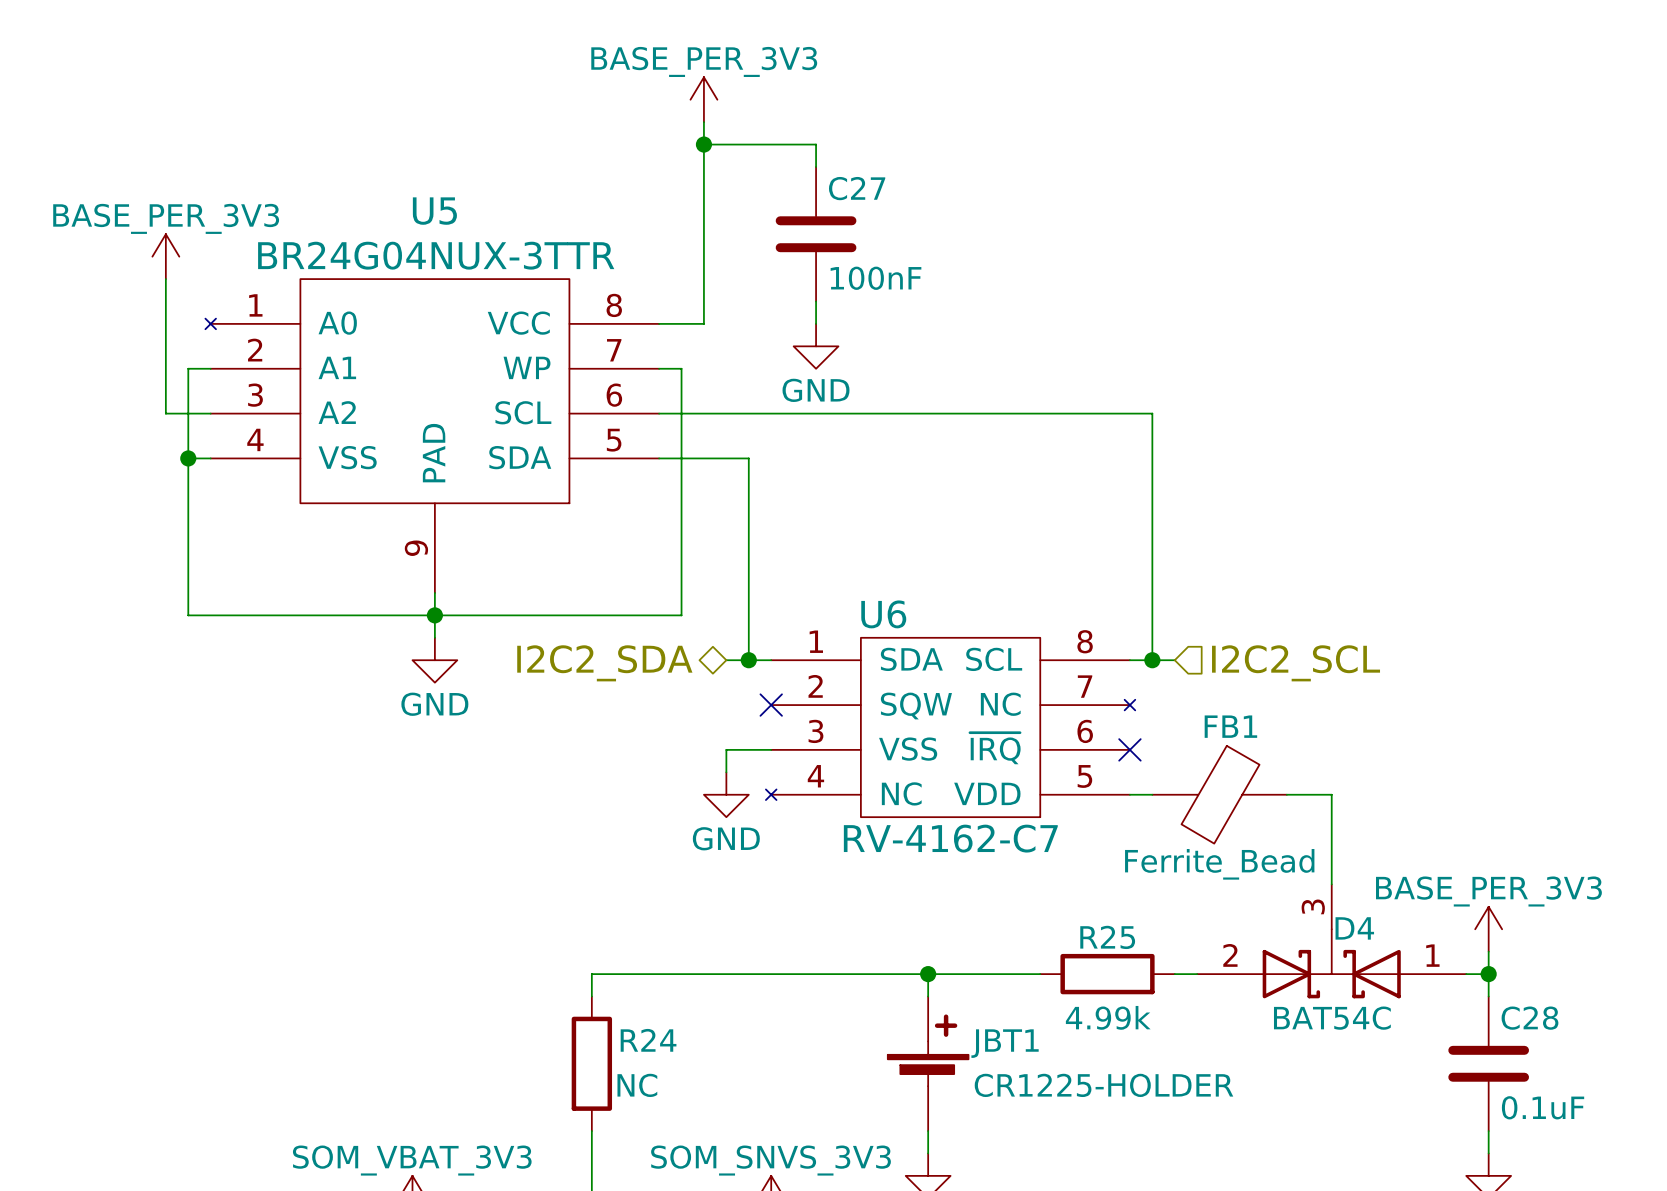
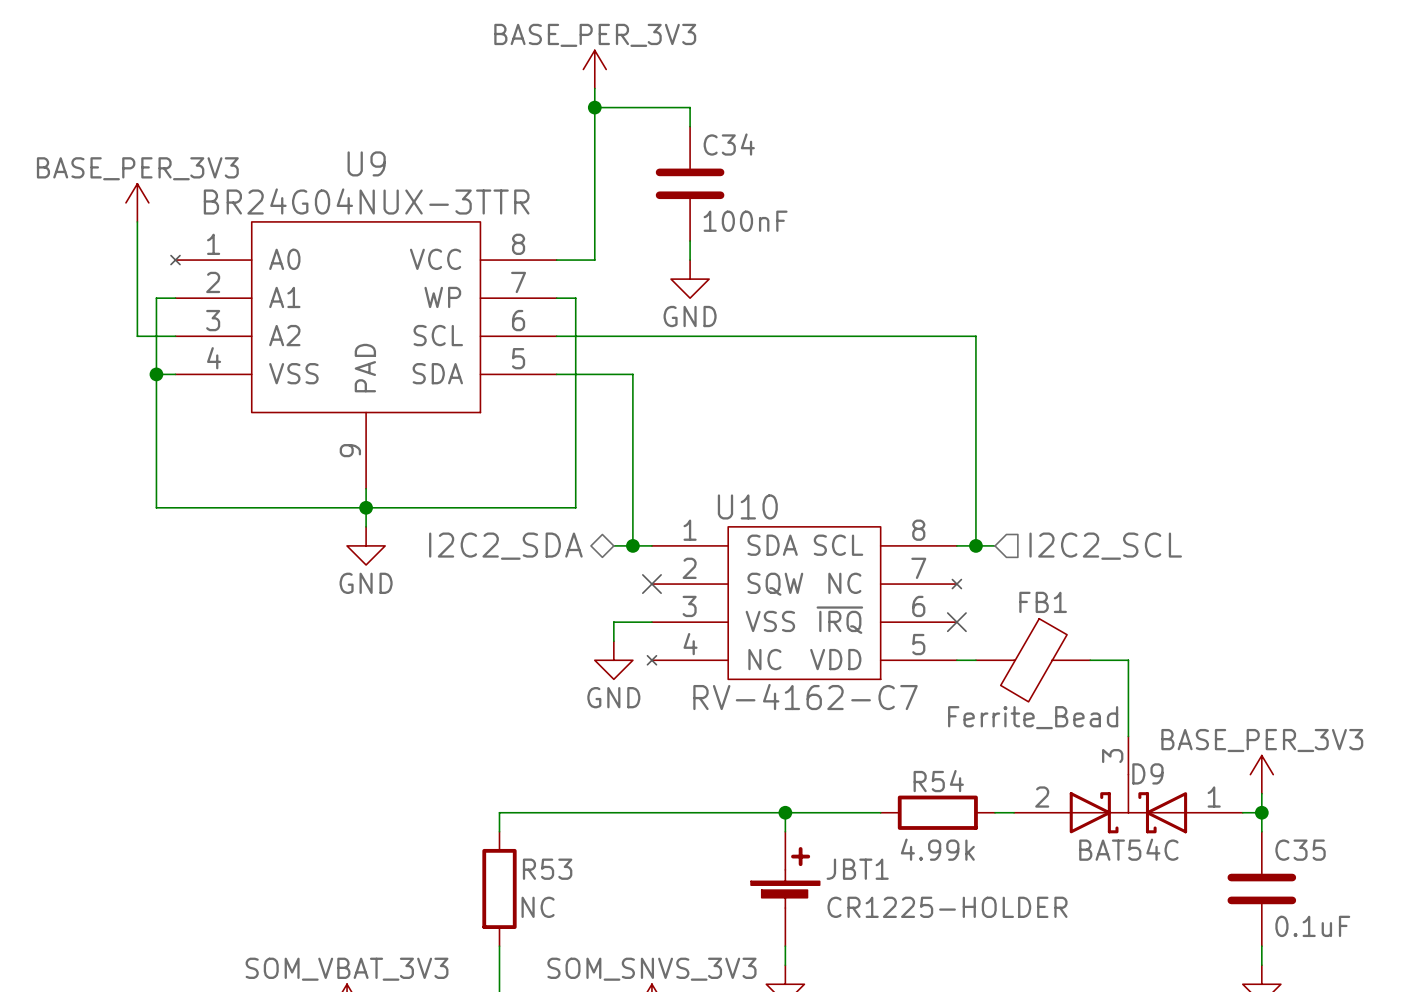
C27 name: C27 (857, 188) -> C34 (729, 144)
U5 name: U5 (434, 211) -> U9 (366, 163)
U6 name: U6 (883, 614) -> U10 (747, 506)
D4 name: D4 (1354, 928) -> D9 (1147, 773)
R25 name: R25 (1107, 937) -> R54 (938, 781)
C28 name: C28 (1529, 1018) -> C35 (1300, 850)
R24 name: R24 (648, 1040) -> R53 (547, 869)

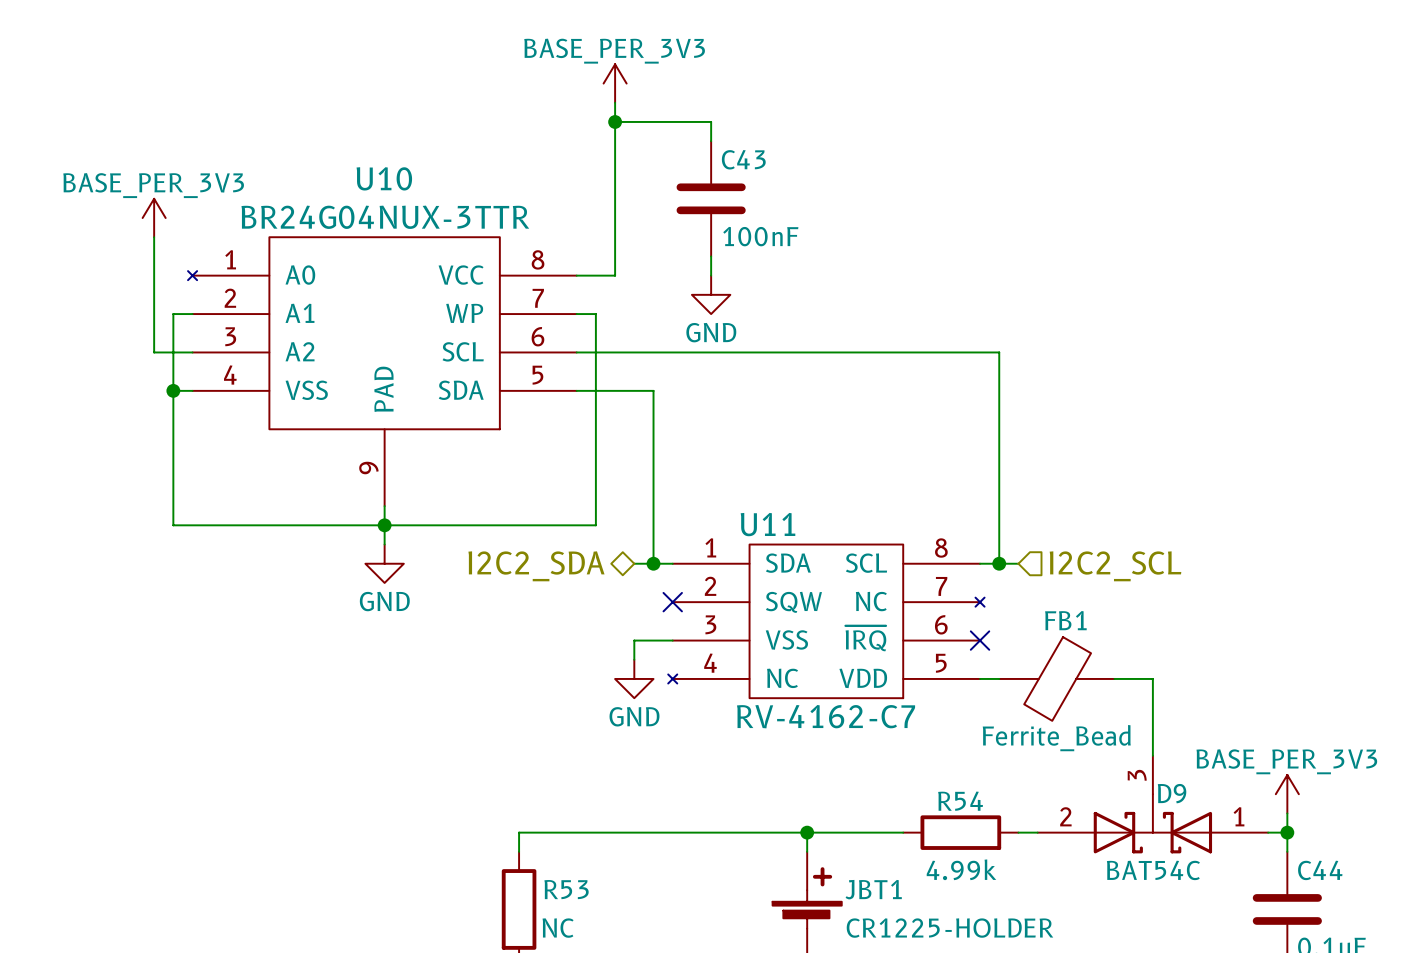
C34 name: C34 (729, 144) -> C43 (743, 159)
U9 name: U9 (366, 163) -> U10 (384, 178)
U10 name: U10 (747, 506) -> U11 (768, 524)
C35 name: C35 (1300, 850) -> C44 (1320, 870)

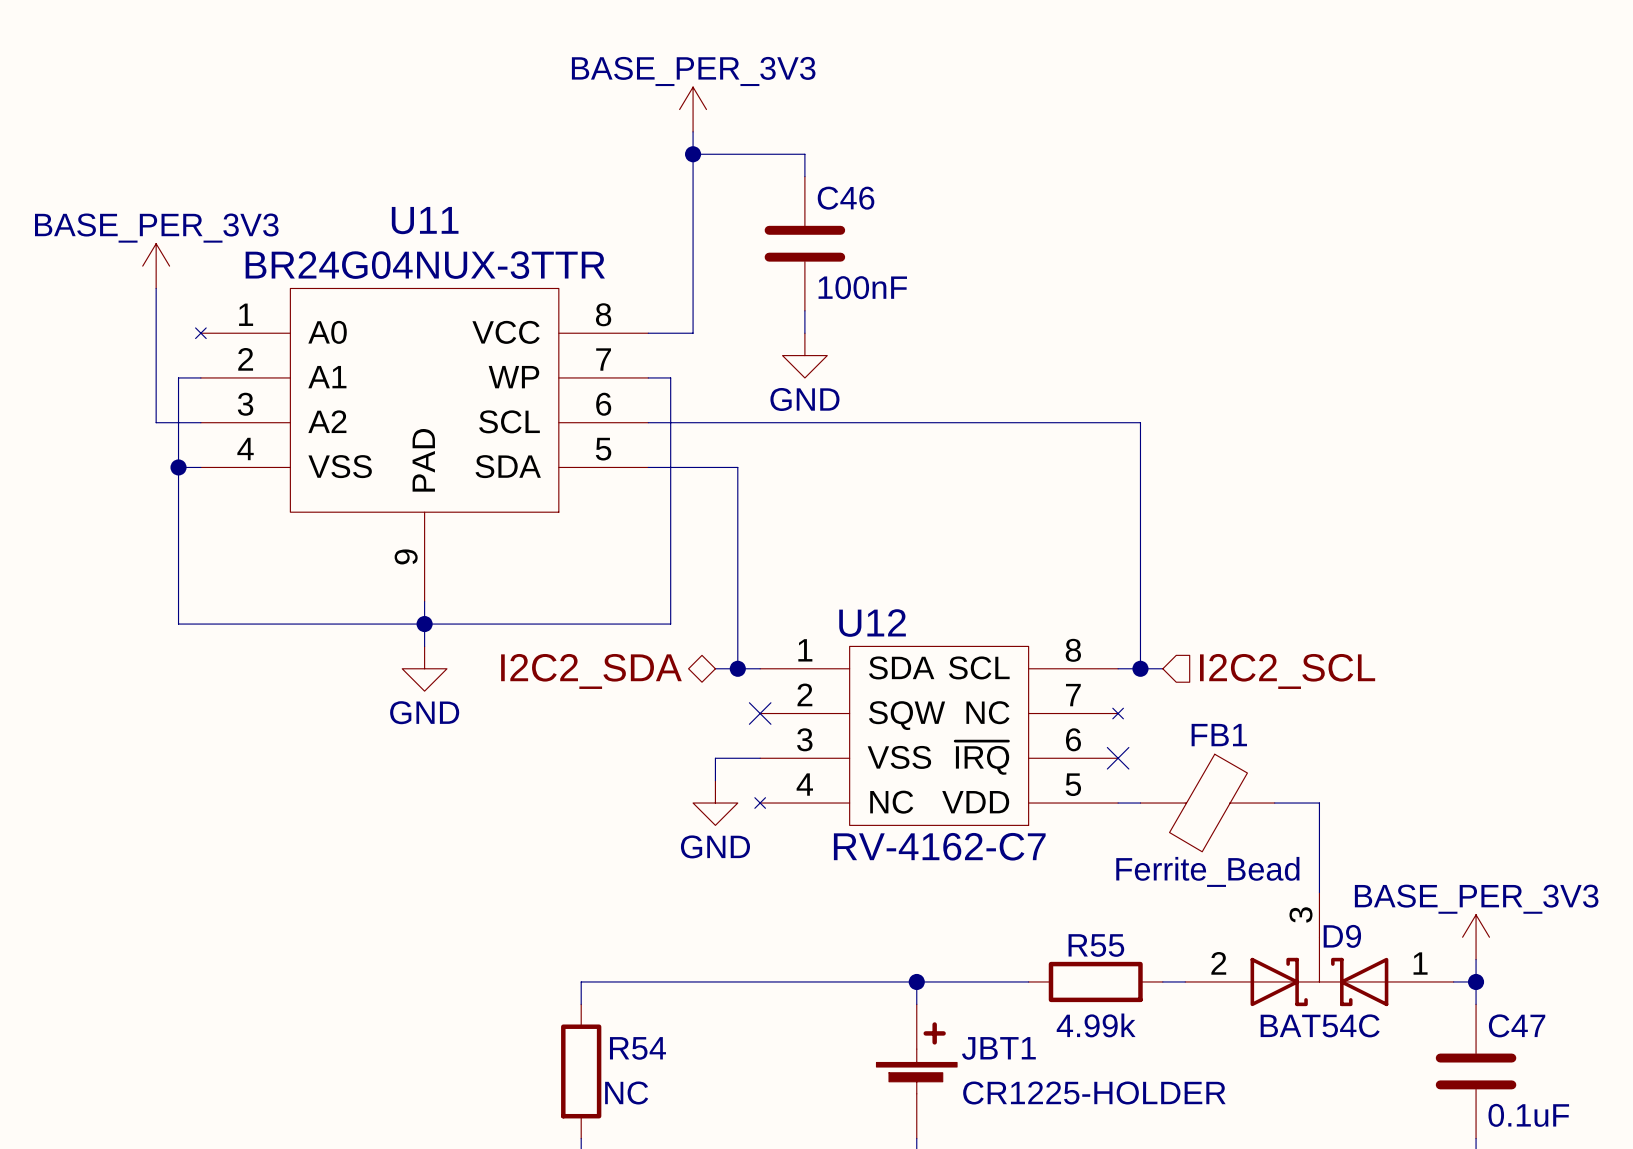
C43 name: C43 (743, 159) -> C46 (846, 198)
U10 name: U10 (384, 178) -> U11 (425, 220)
U11 name: U11 (768, 524) -> U12 (872, 623)
R54 name: R54 (960, 801) -> R55 (1096, 945)
C44 name: C44 (1320, 870) -> C47 (1517, 1025)
R53 name: R53 (566, 889) -> R54 (637, 1048)

